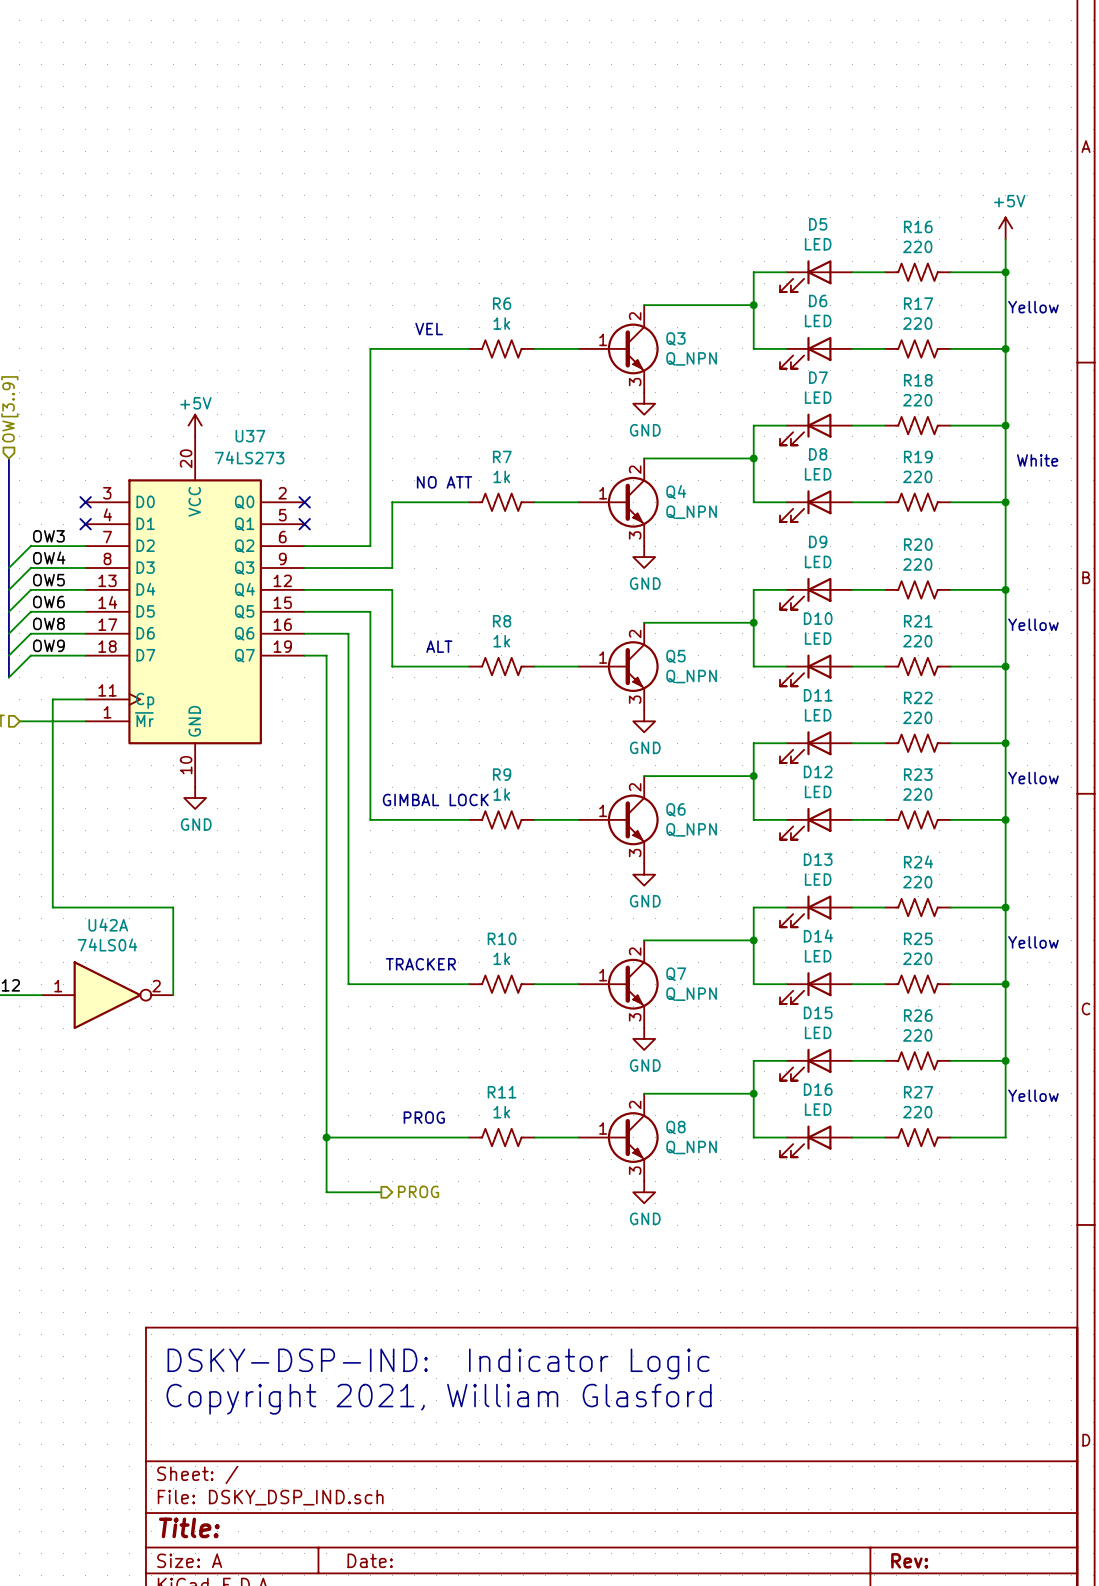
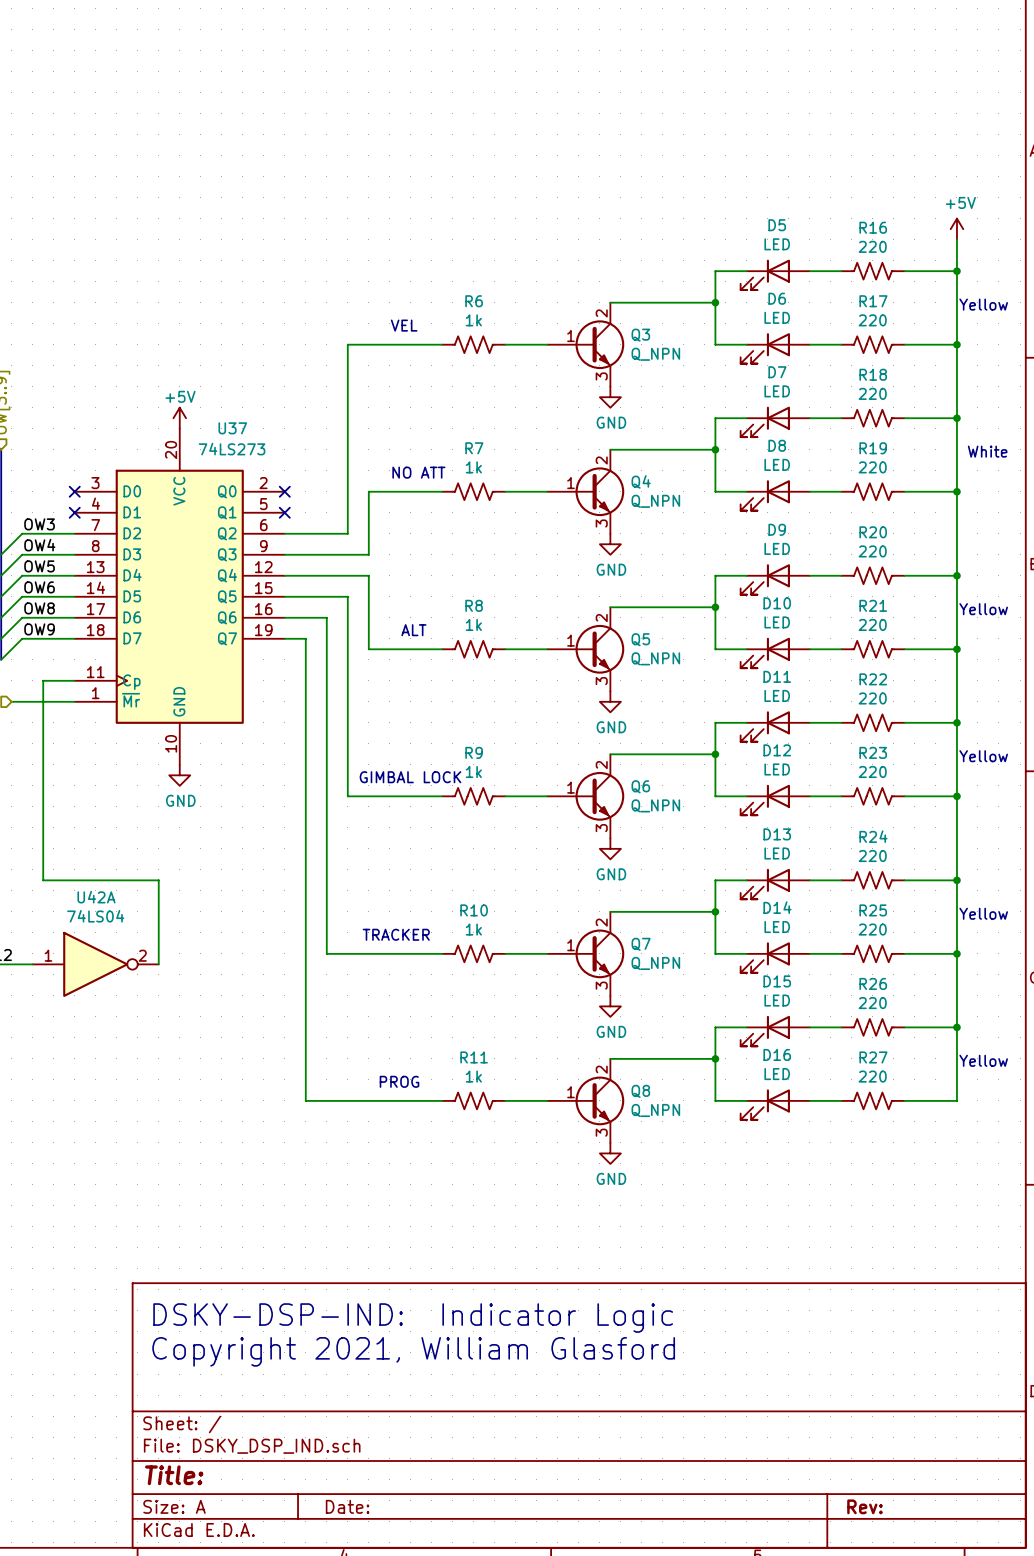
wire: (326, 1137) (326, 1192) (381, 1192) -> none
junction: (326, 1137) -> none
hierarchical label: PROG (418, 1191) -> none

